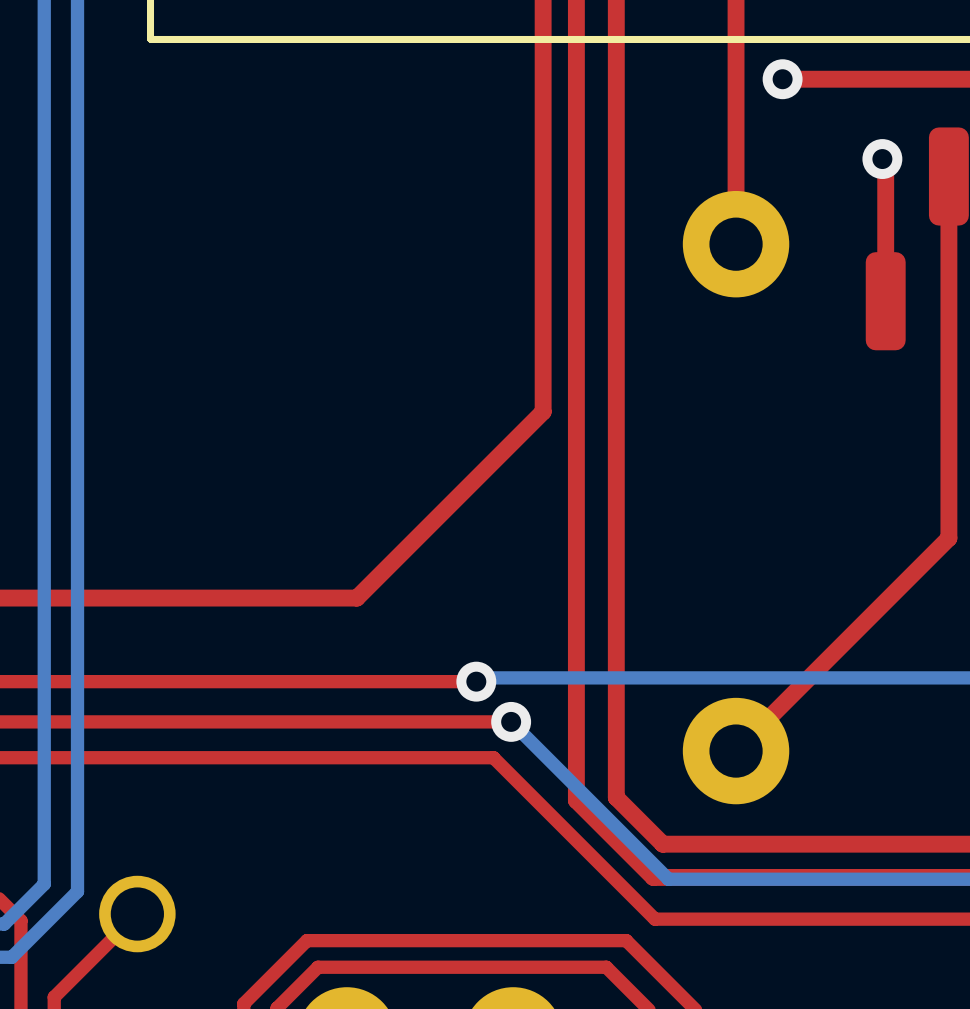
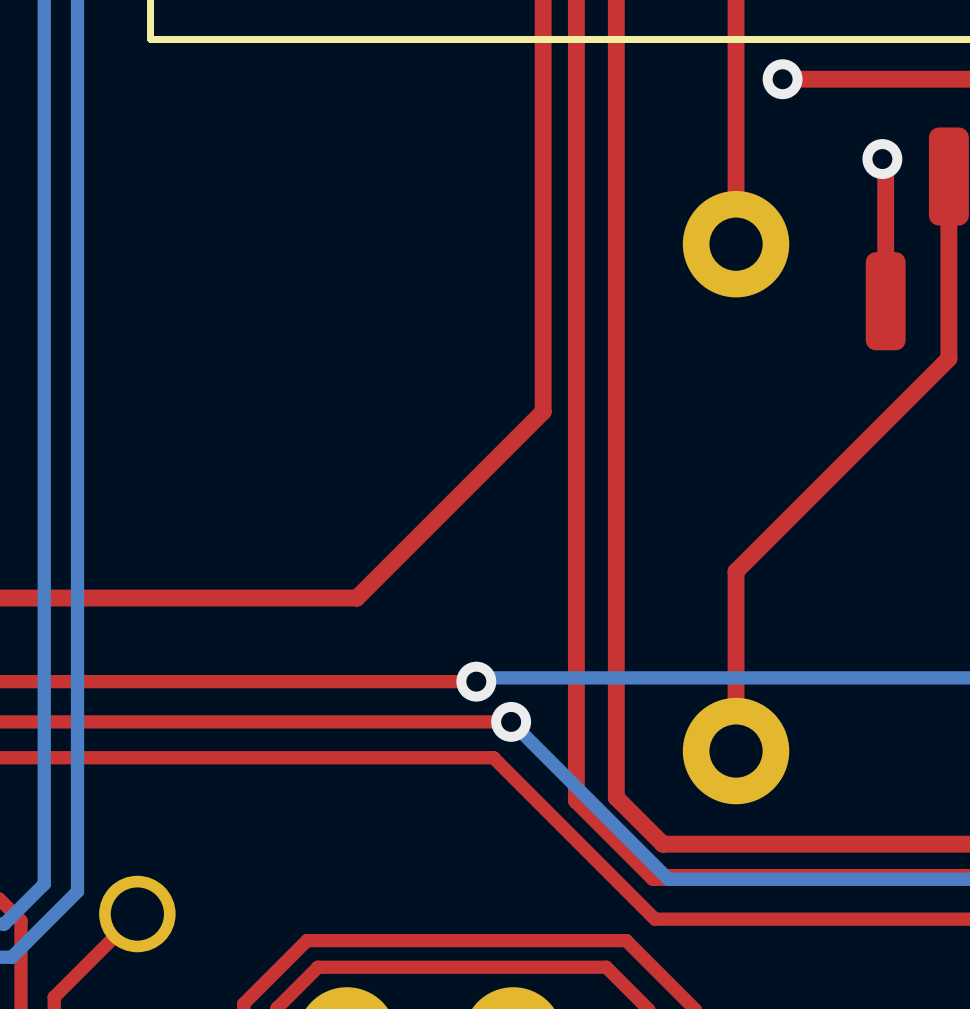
top track: (948, 358) (948, 538) (736, 751) -> (948, 358) (736, 571) (736, 751)

